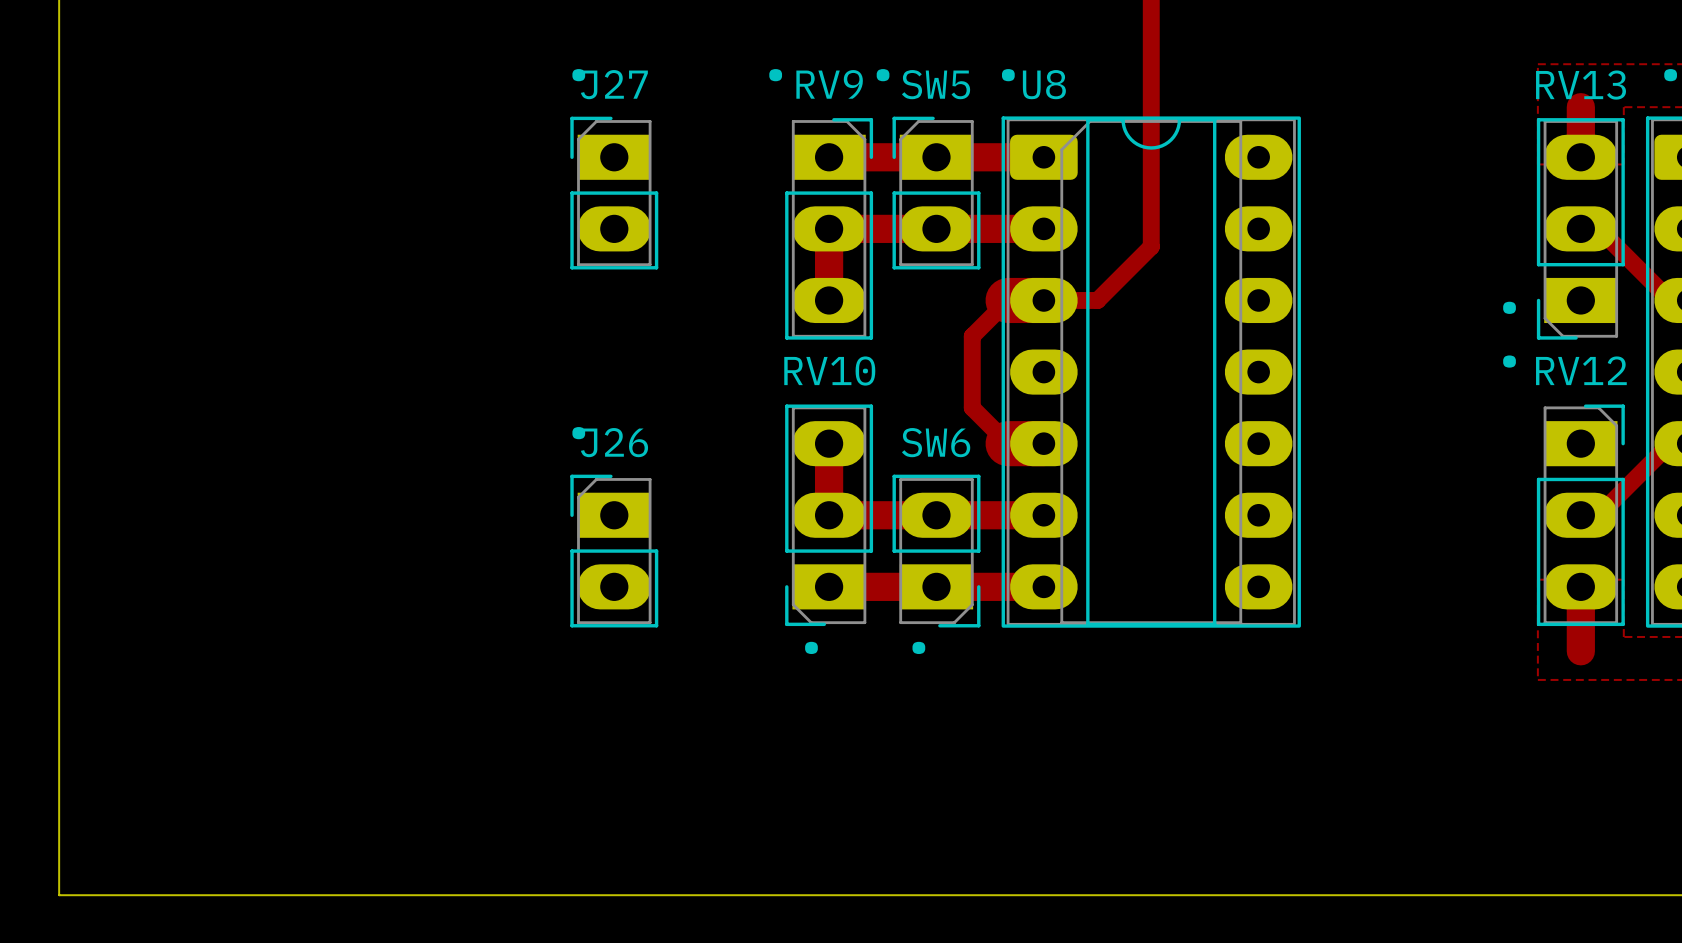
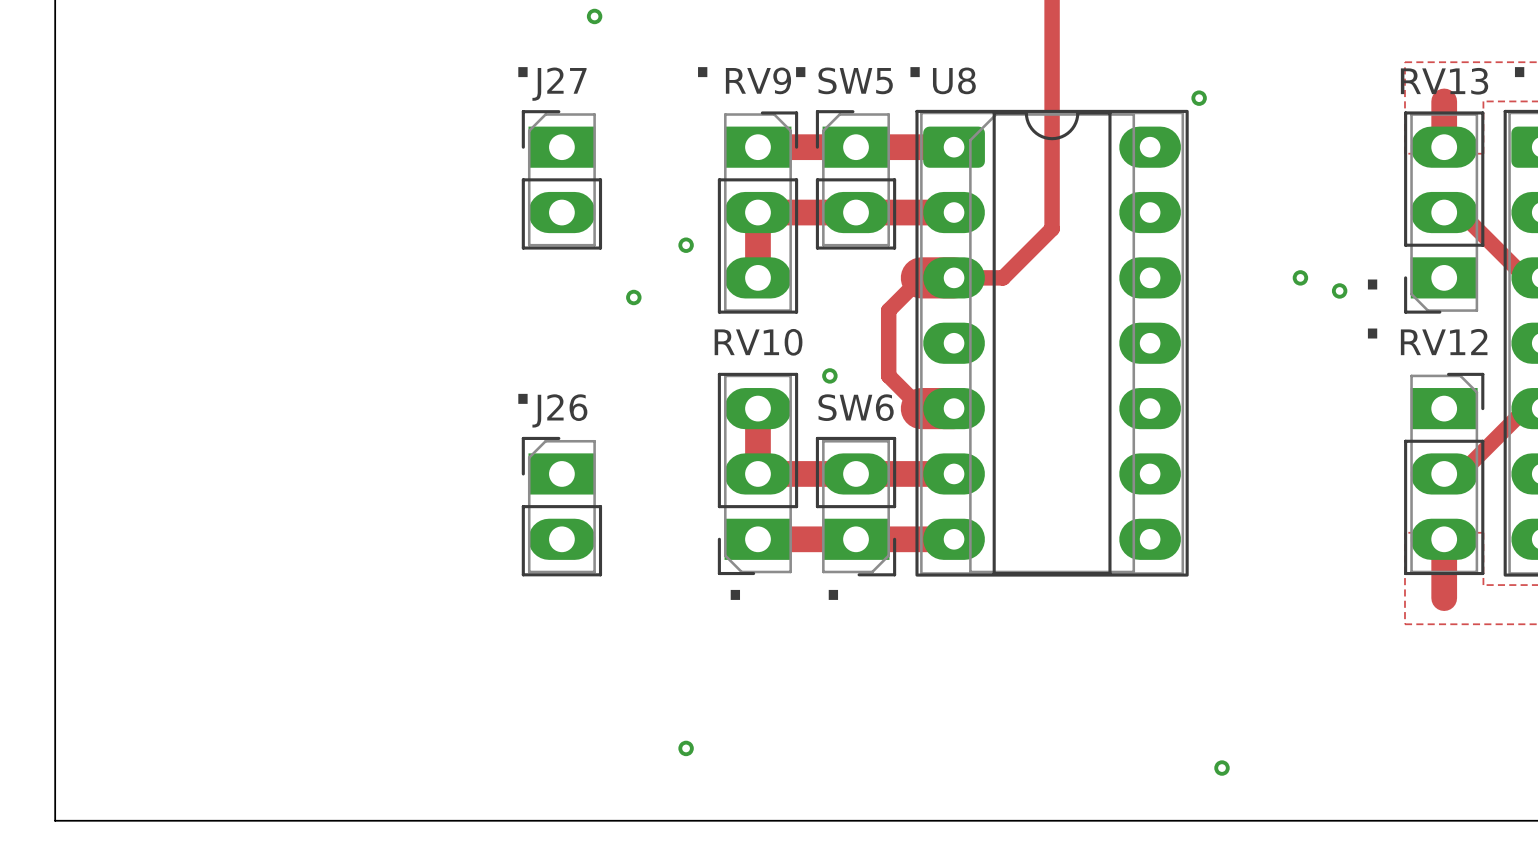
via: none -> (594, 16)
via: none -> (1199, 98)
via: none -> (686, 245)
via: none -> (1300, 277)
via: none -> (1339, 290)
via: none -> (633, 297)
via: none -> (829, 375)
via: none -> (686, 748)
via: none -> (1222, 768)

